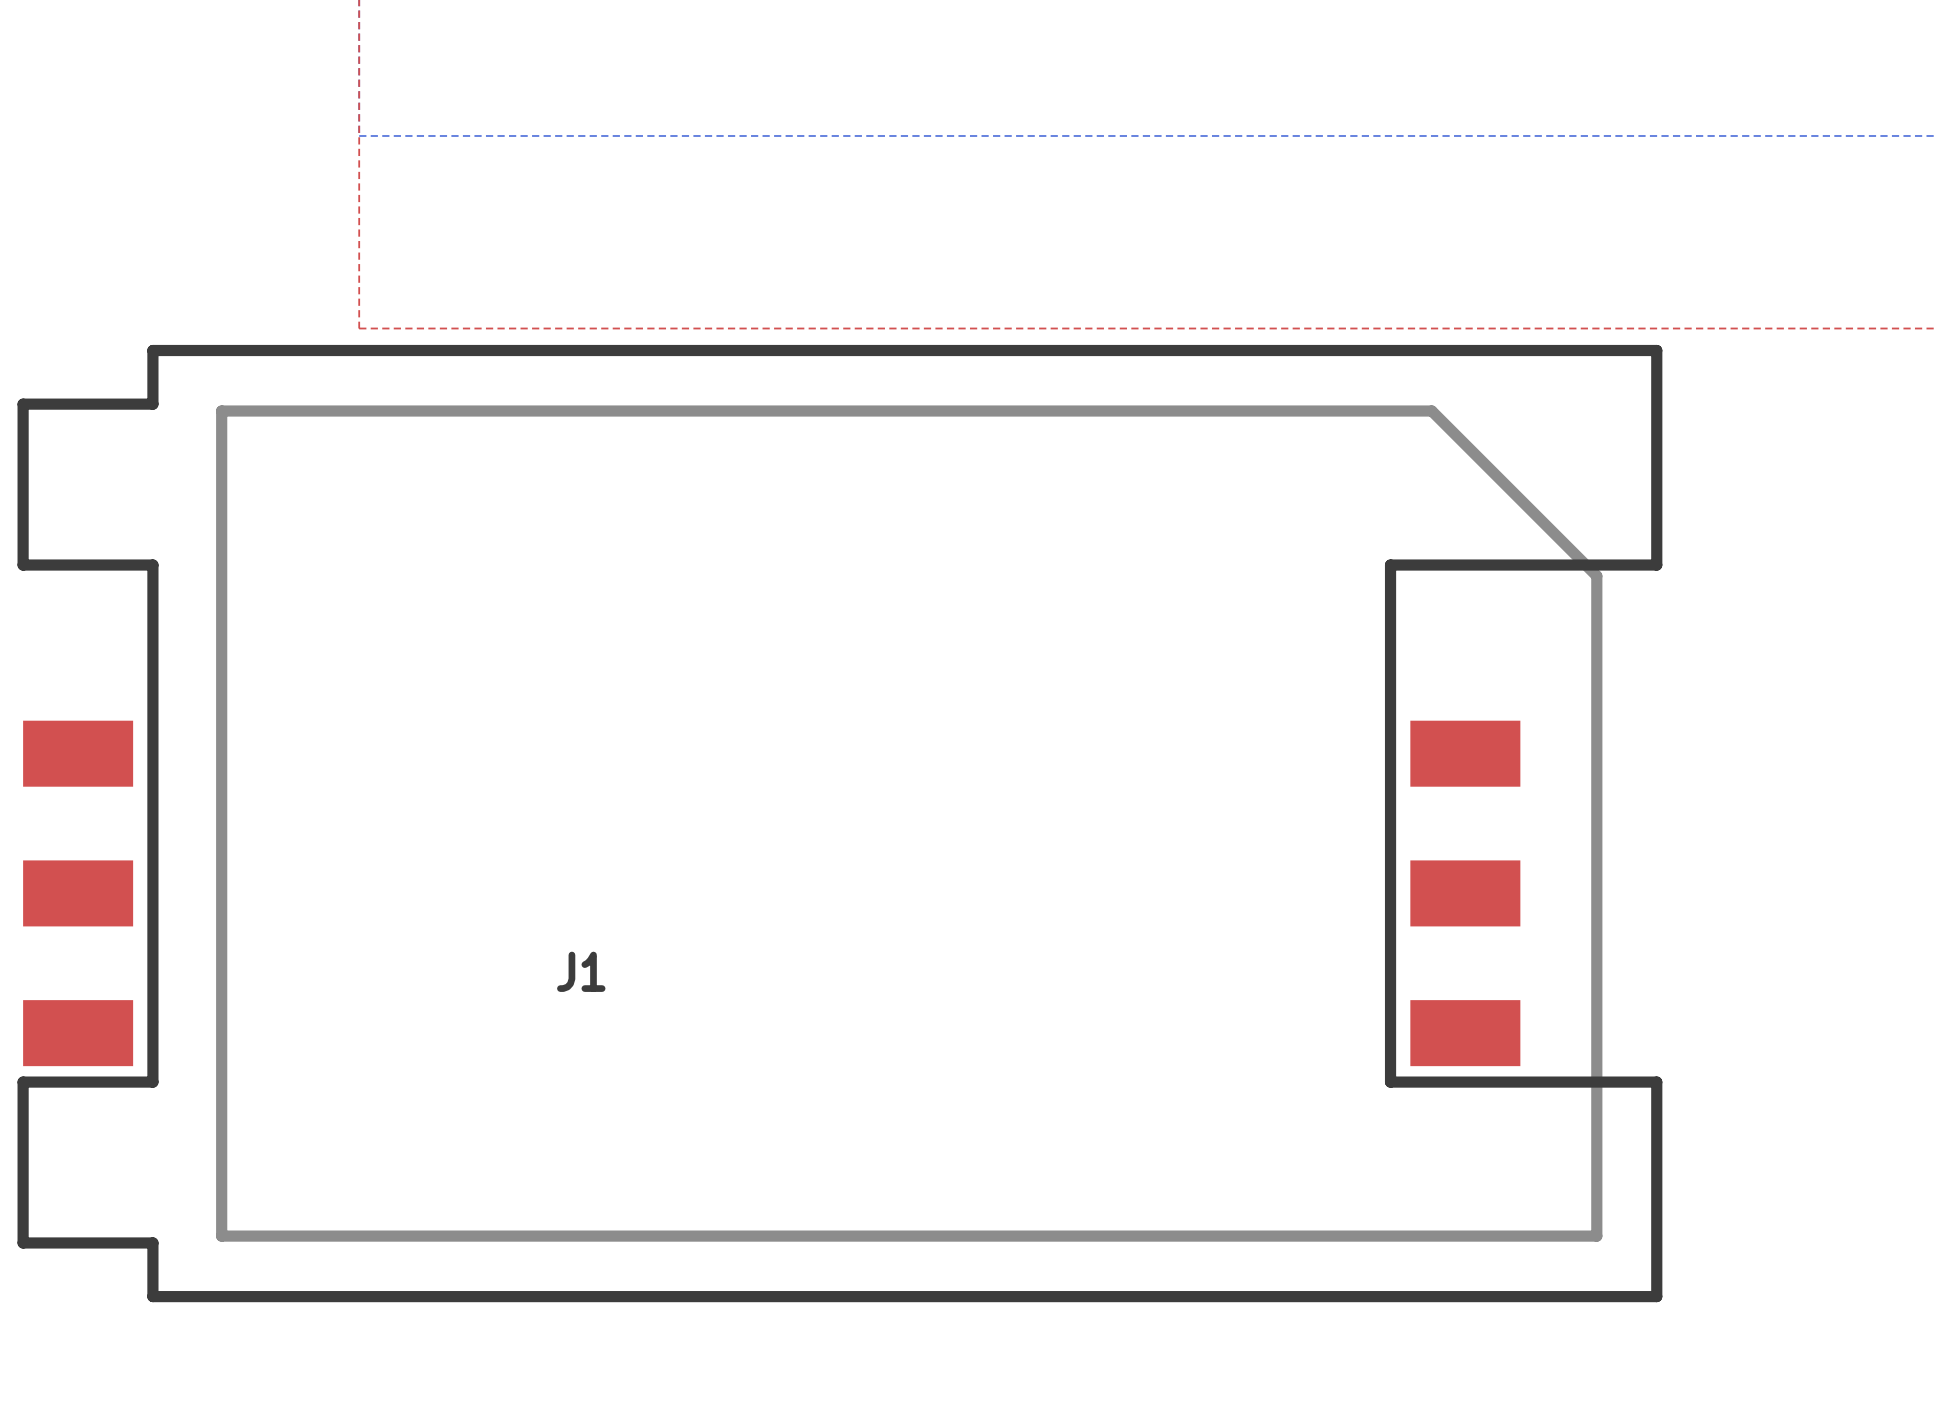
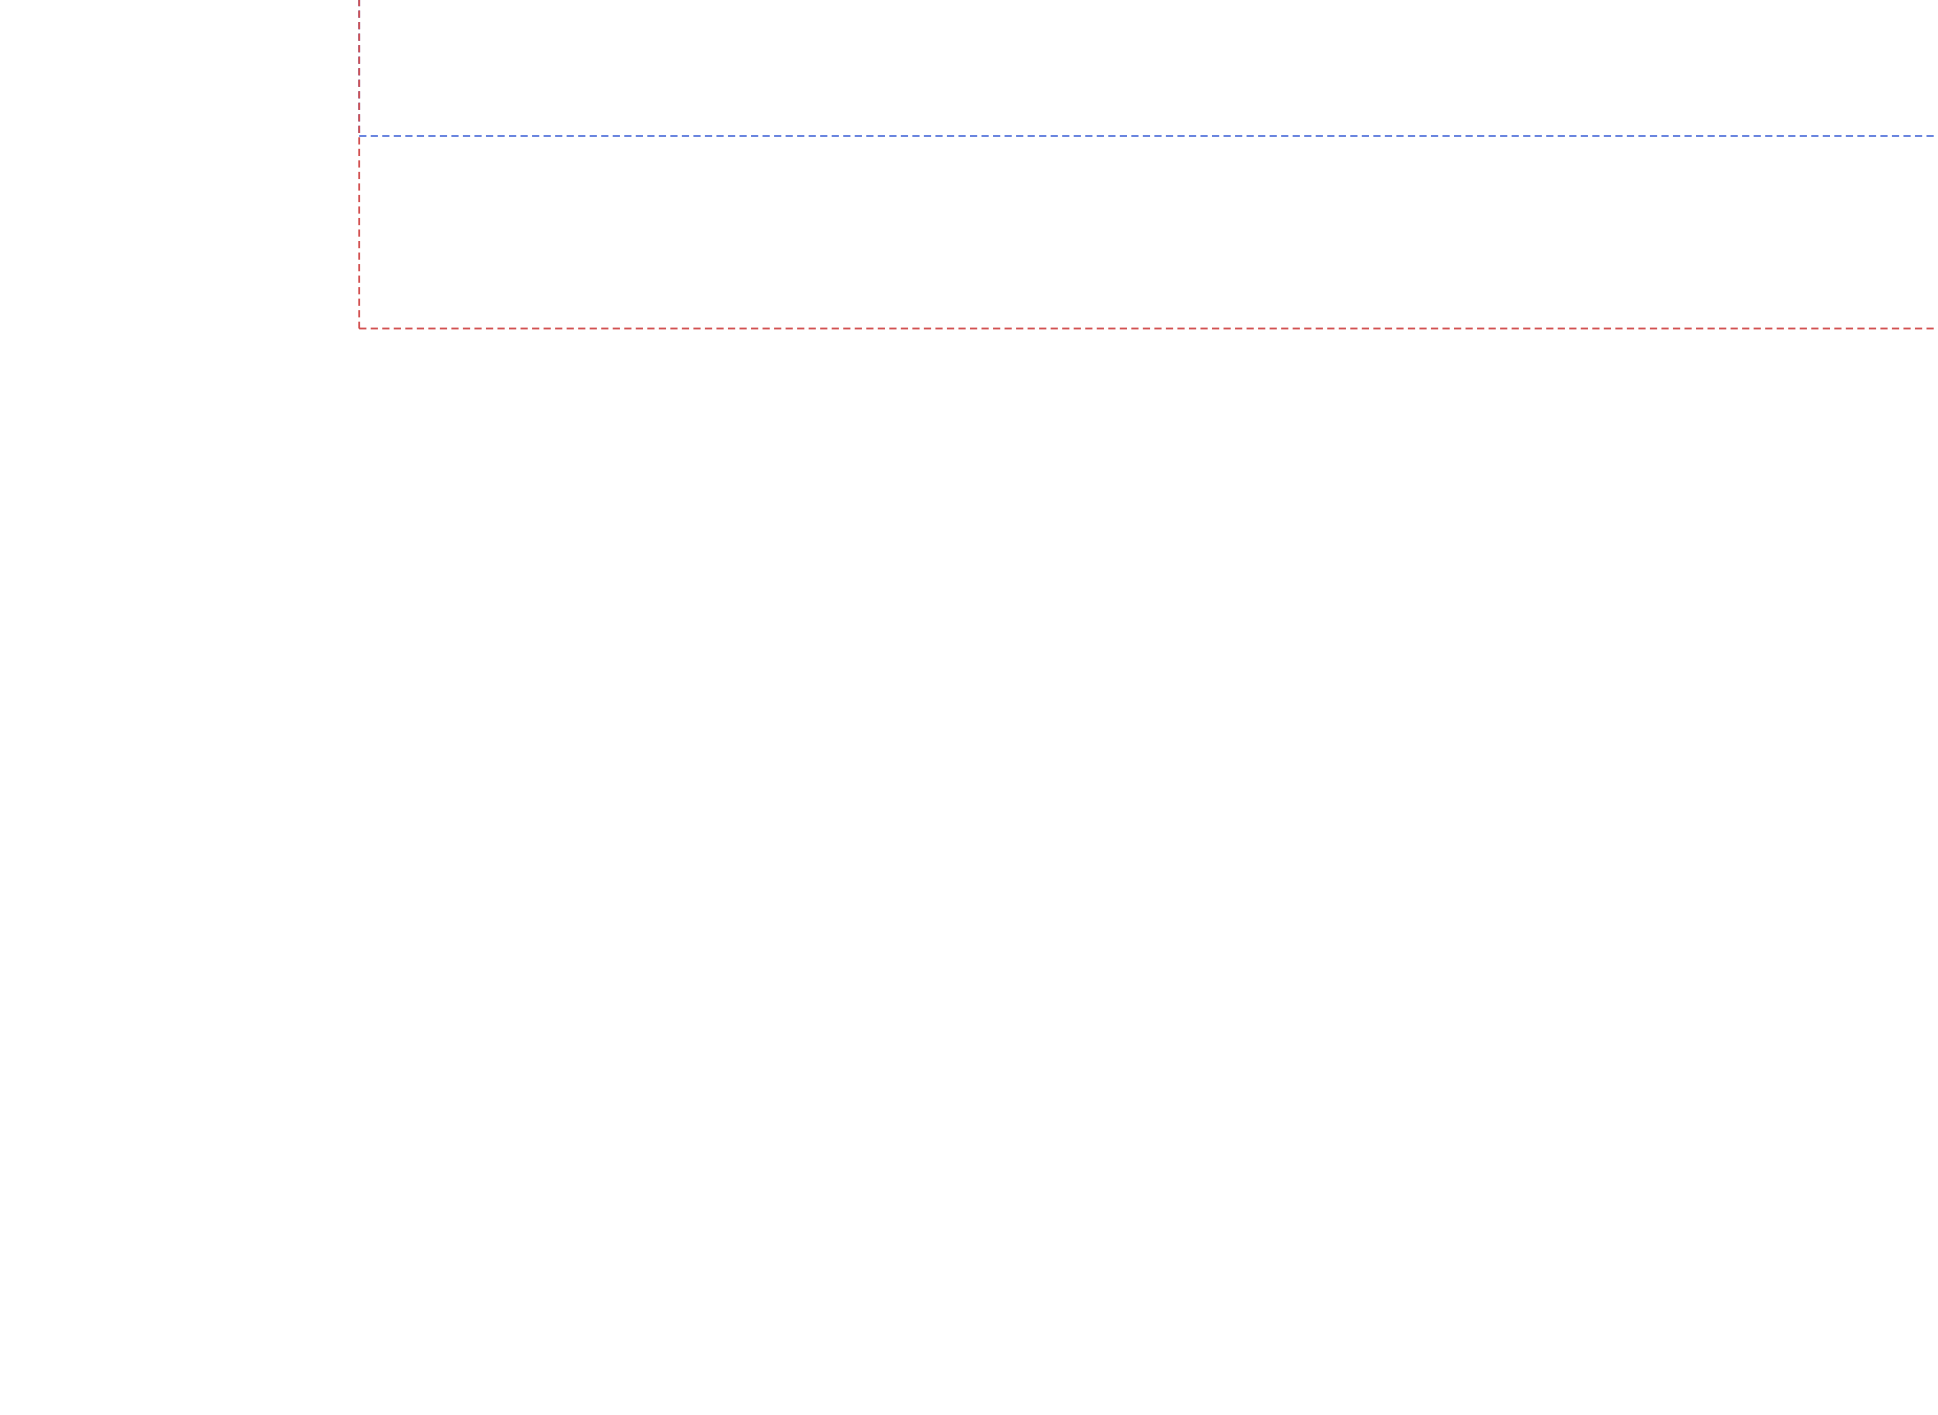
J1: (839, 823) -> none

